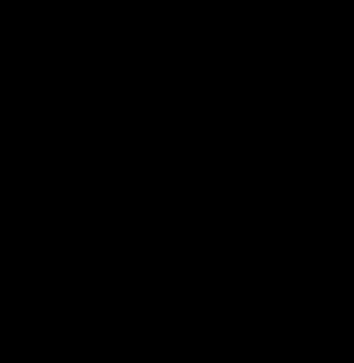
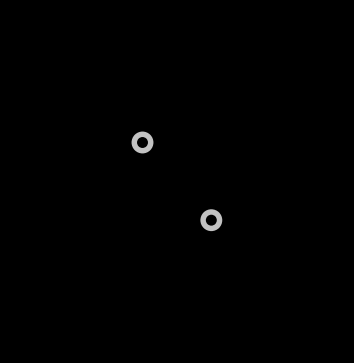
via: none -> (142, 142)
via: none -> (211, 220)

